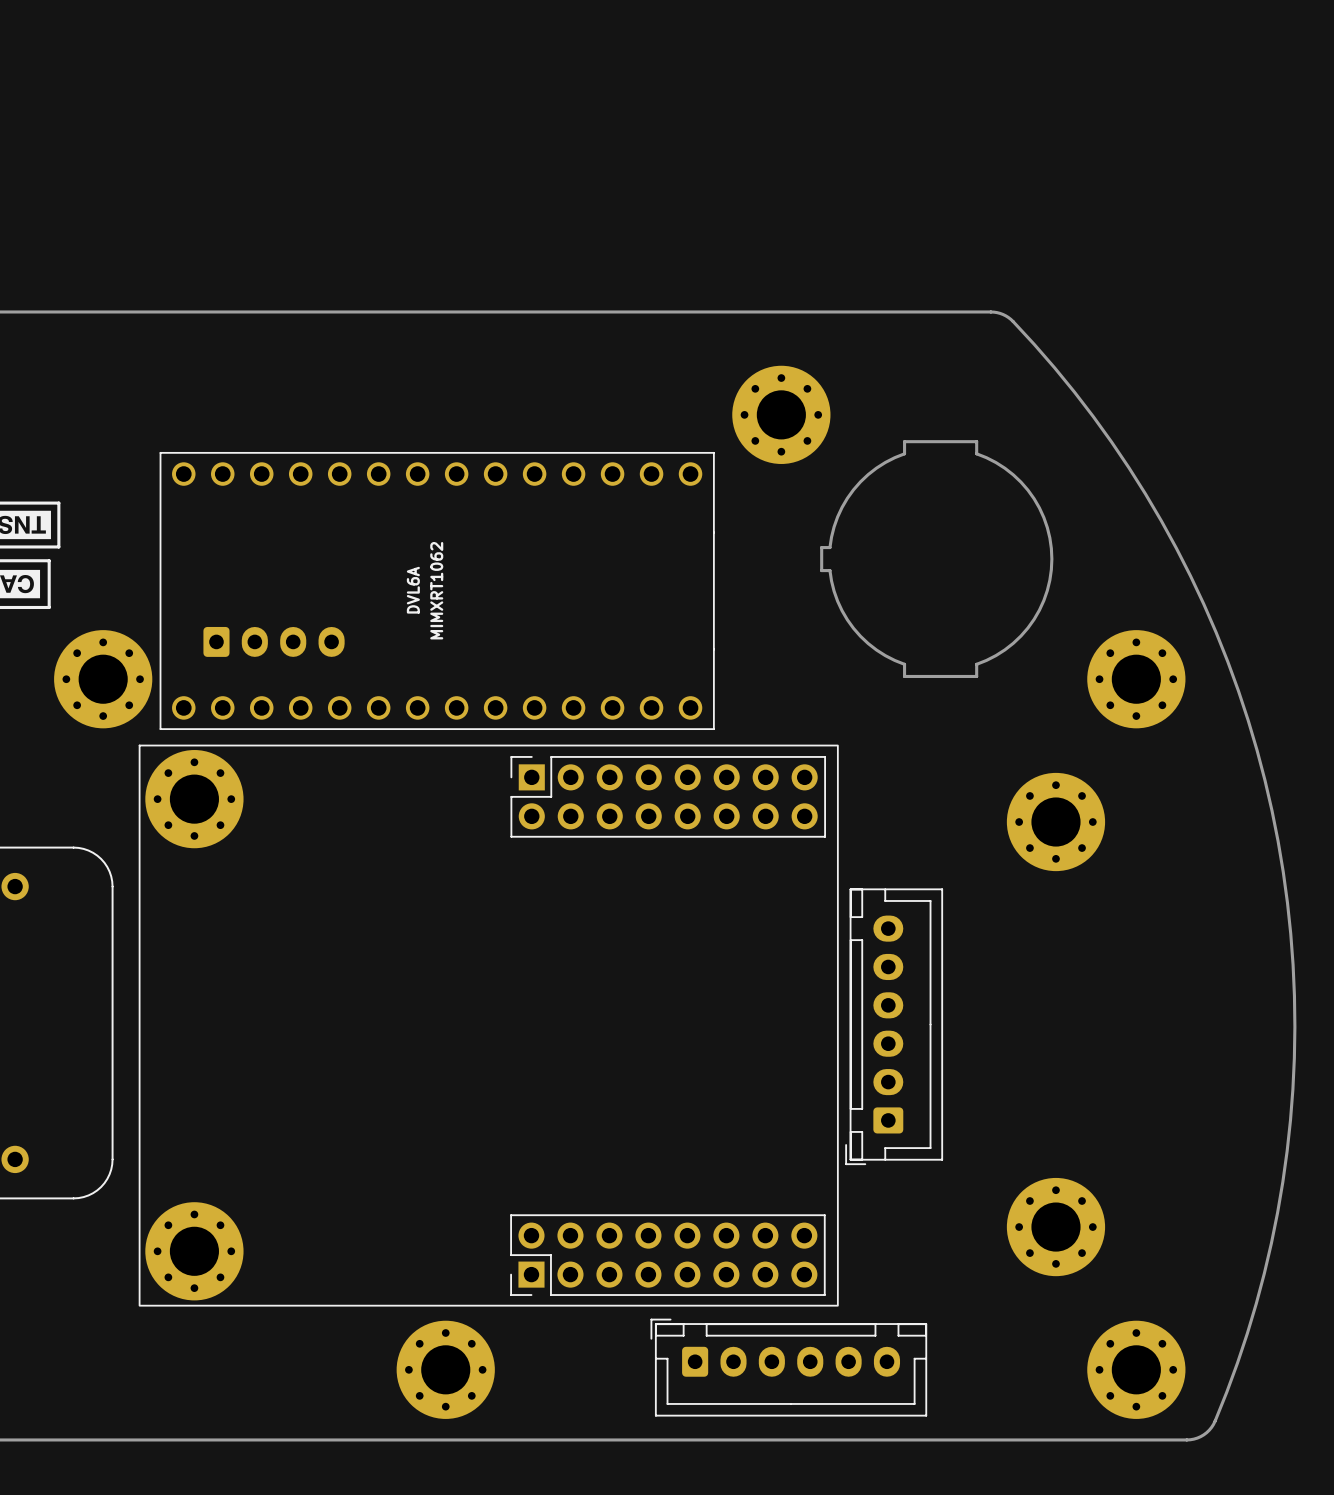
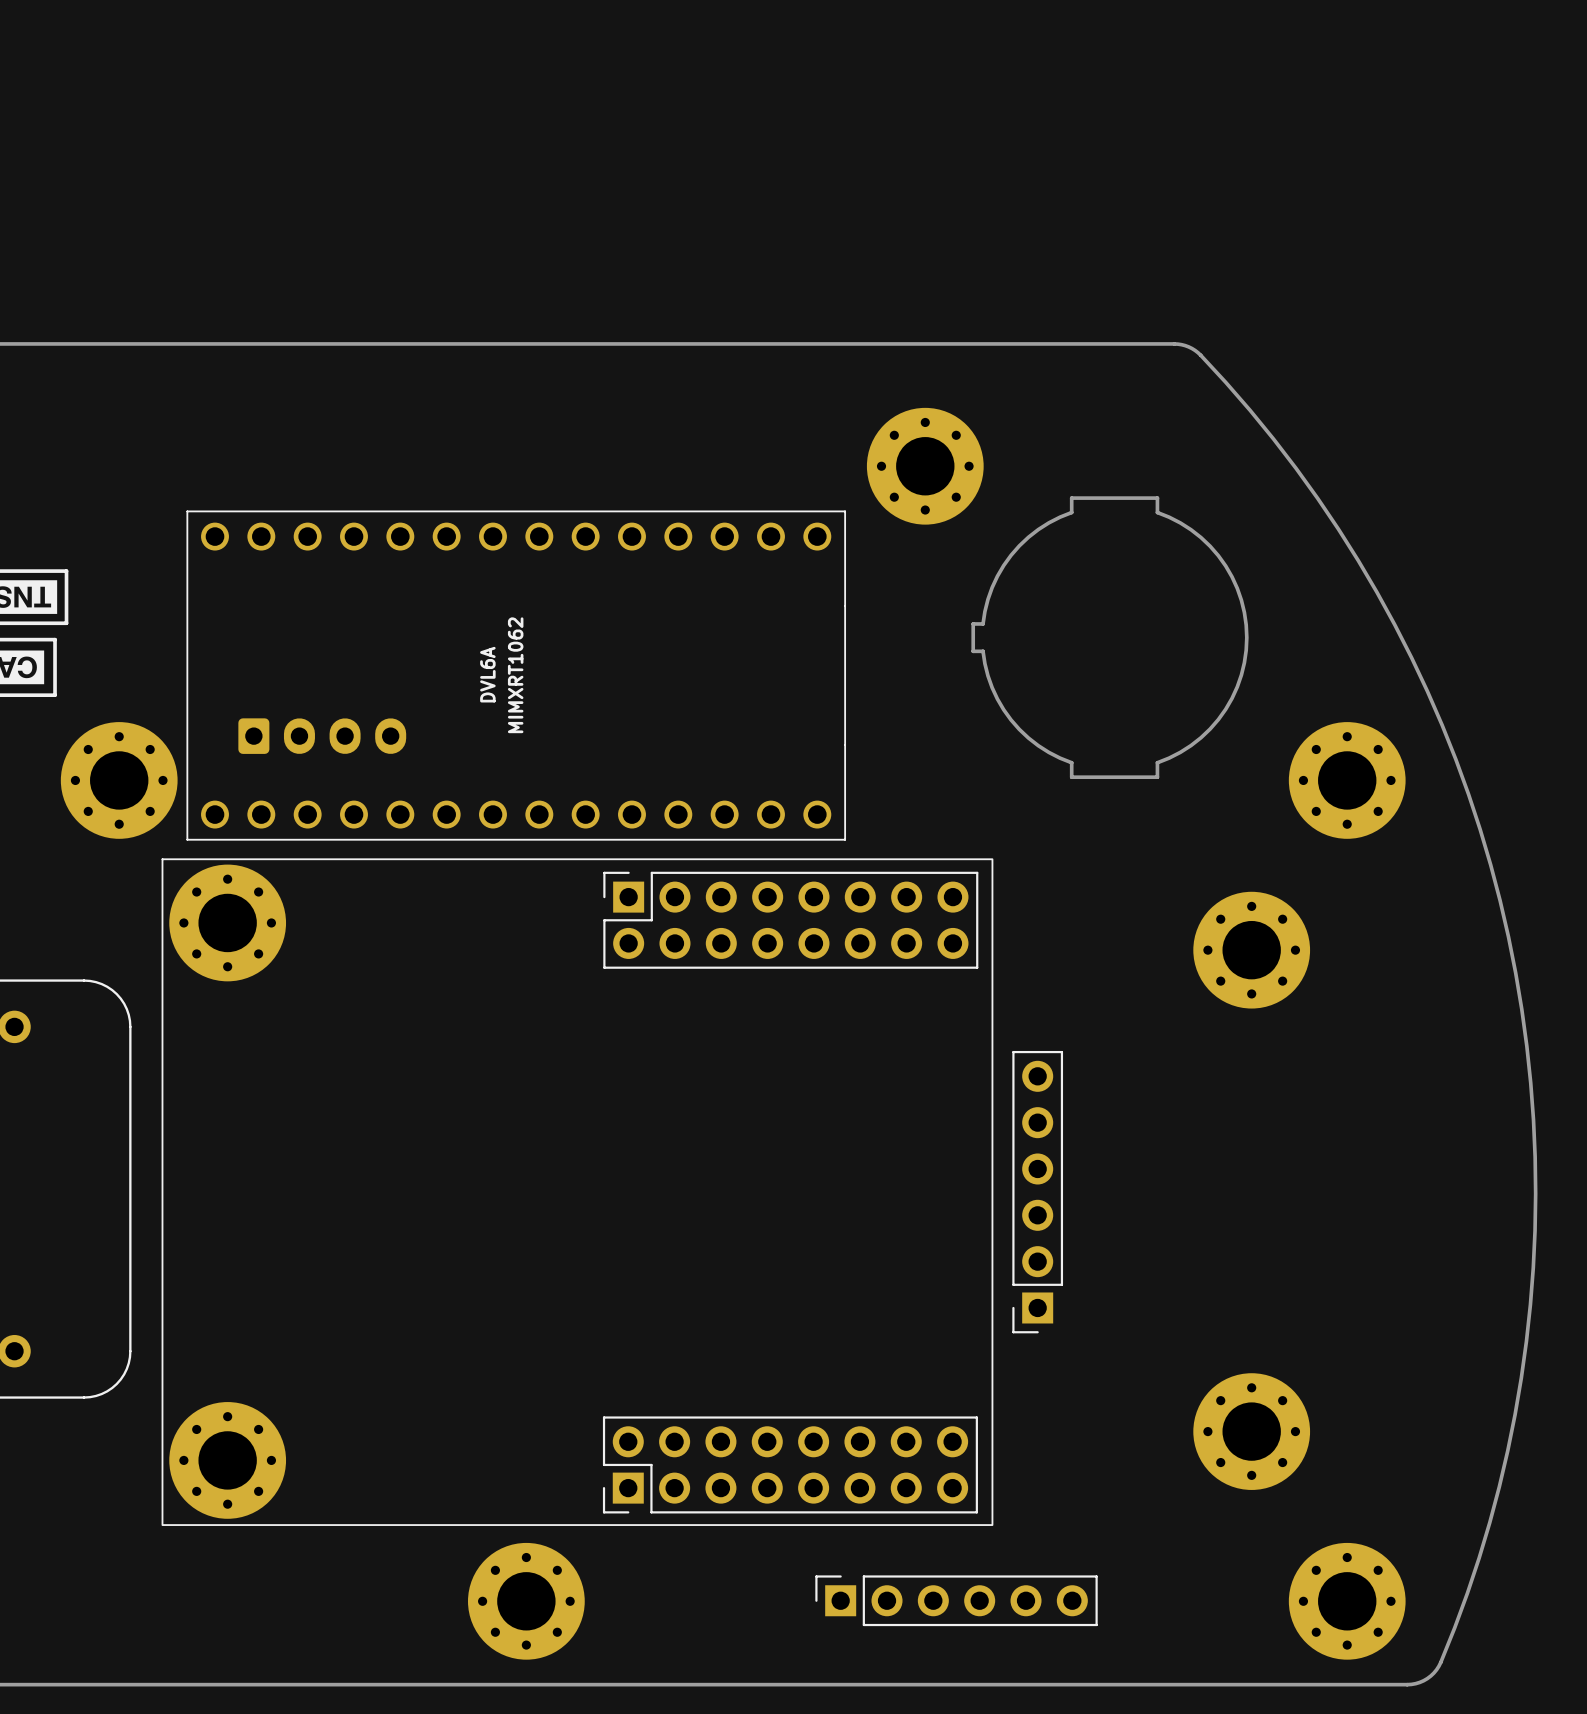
part: none -> (1037, 1192)
part: (894, 1026) -> none
part: (788, 1367) -> none
part: none -> (956, 1600)

